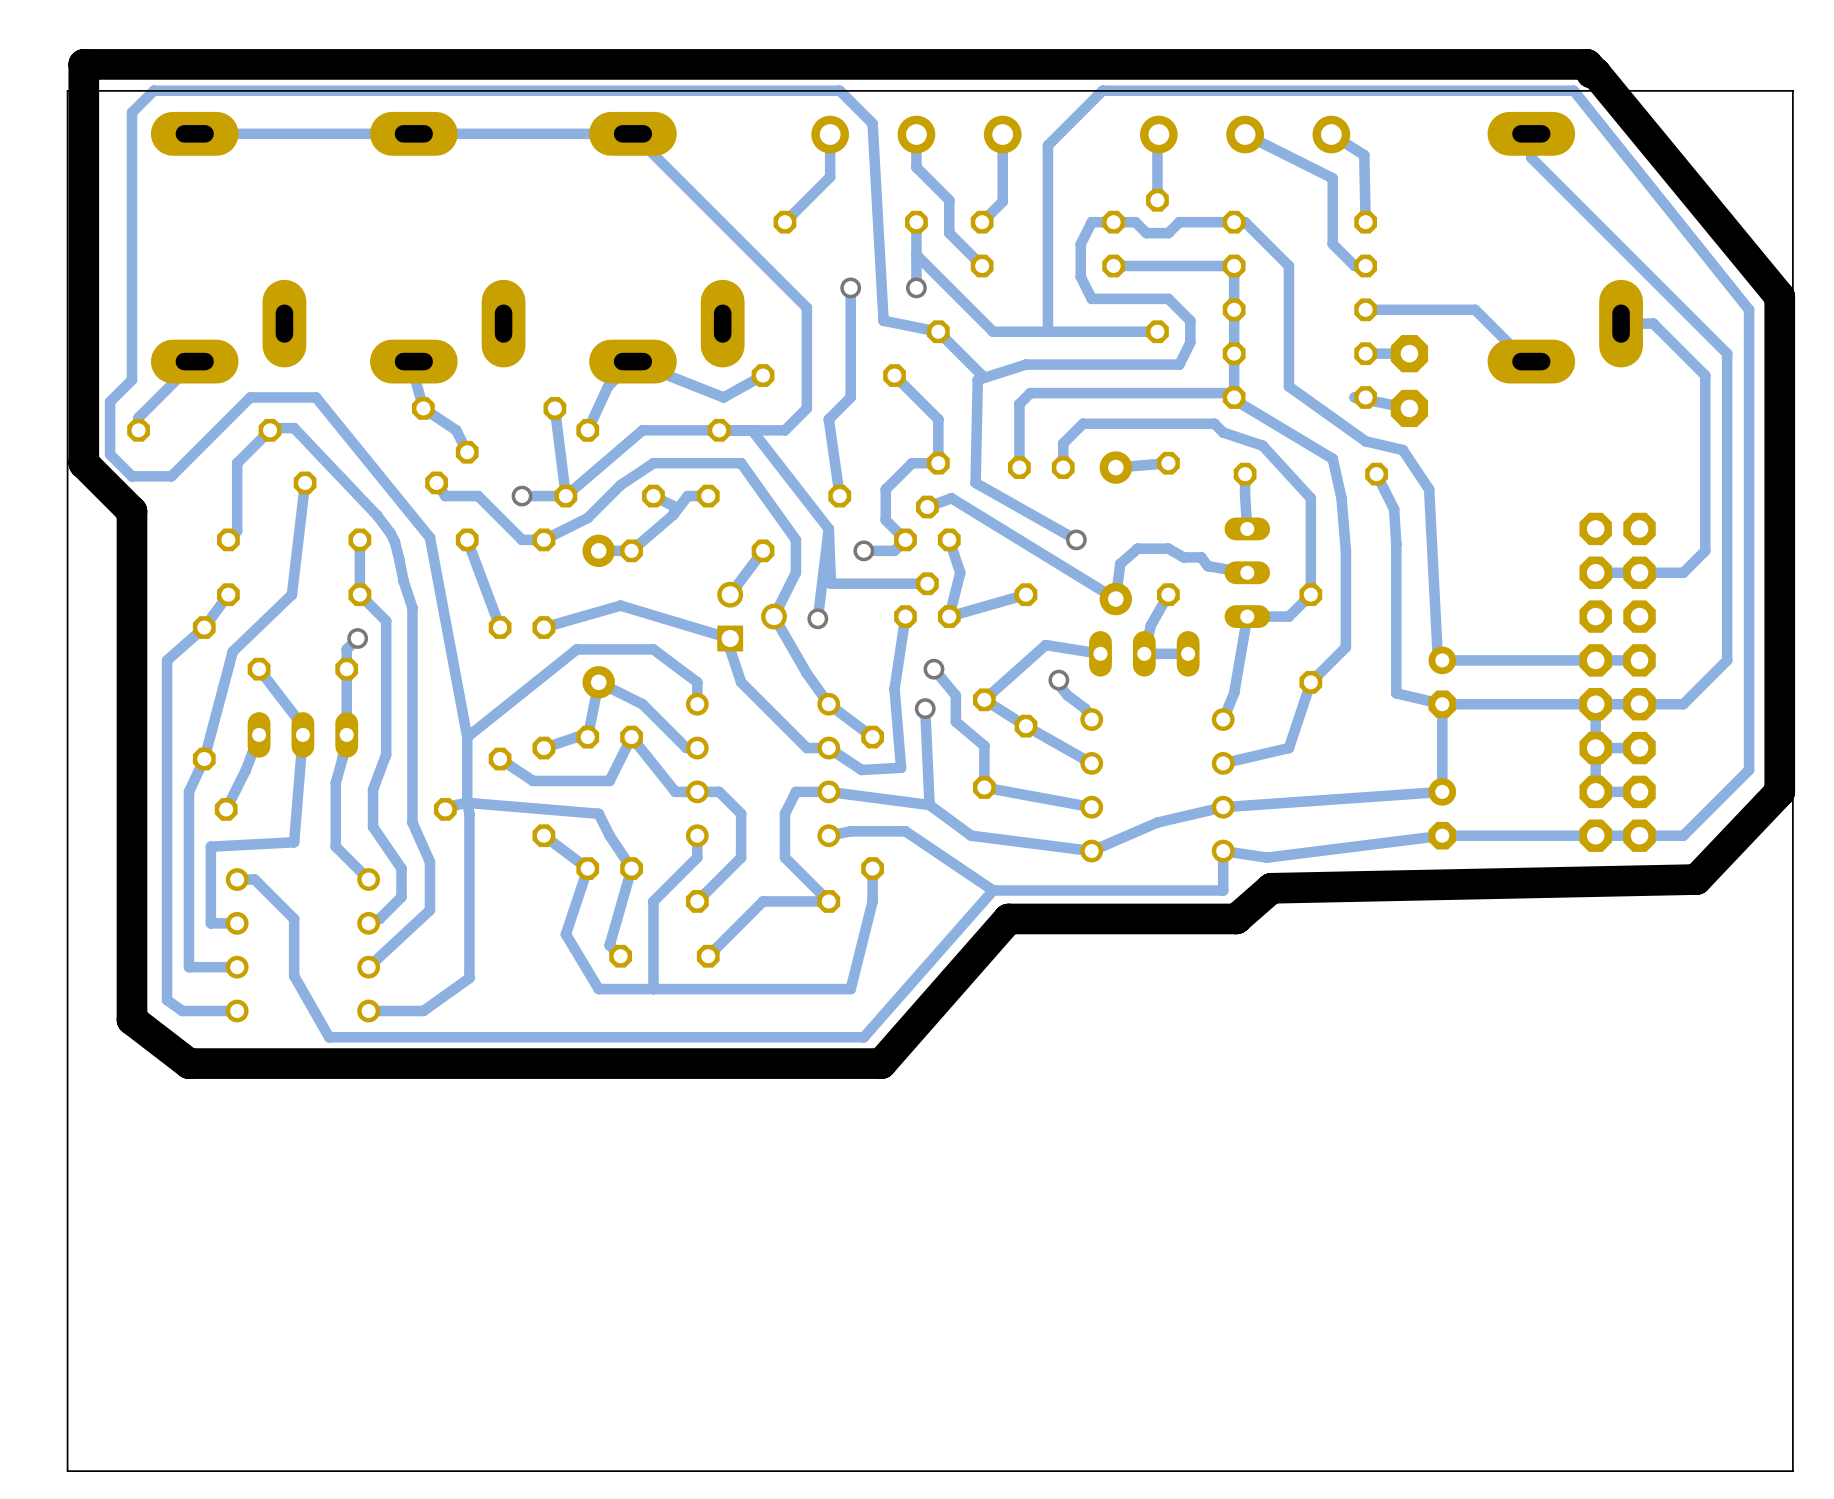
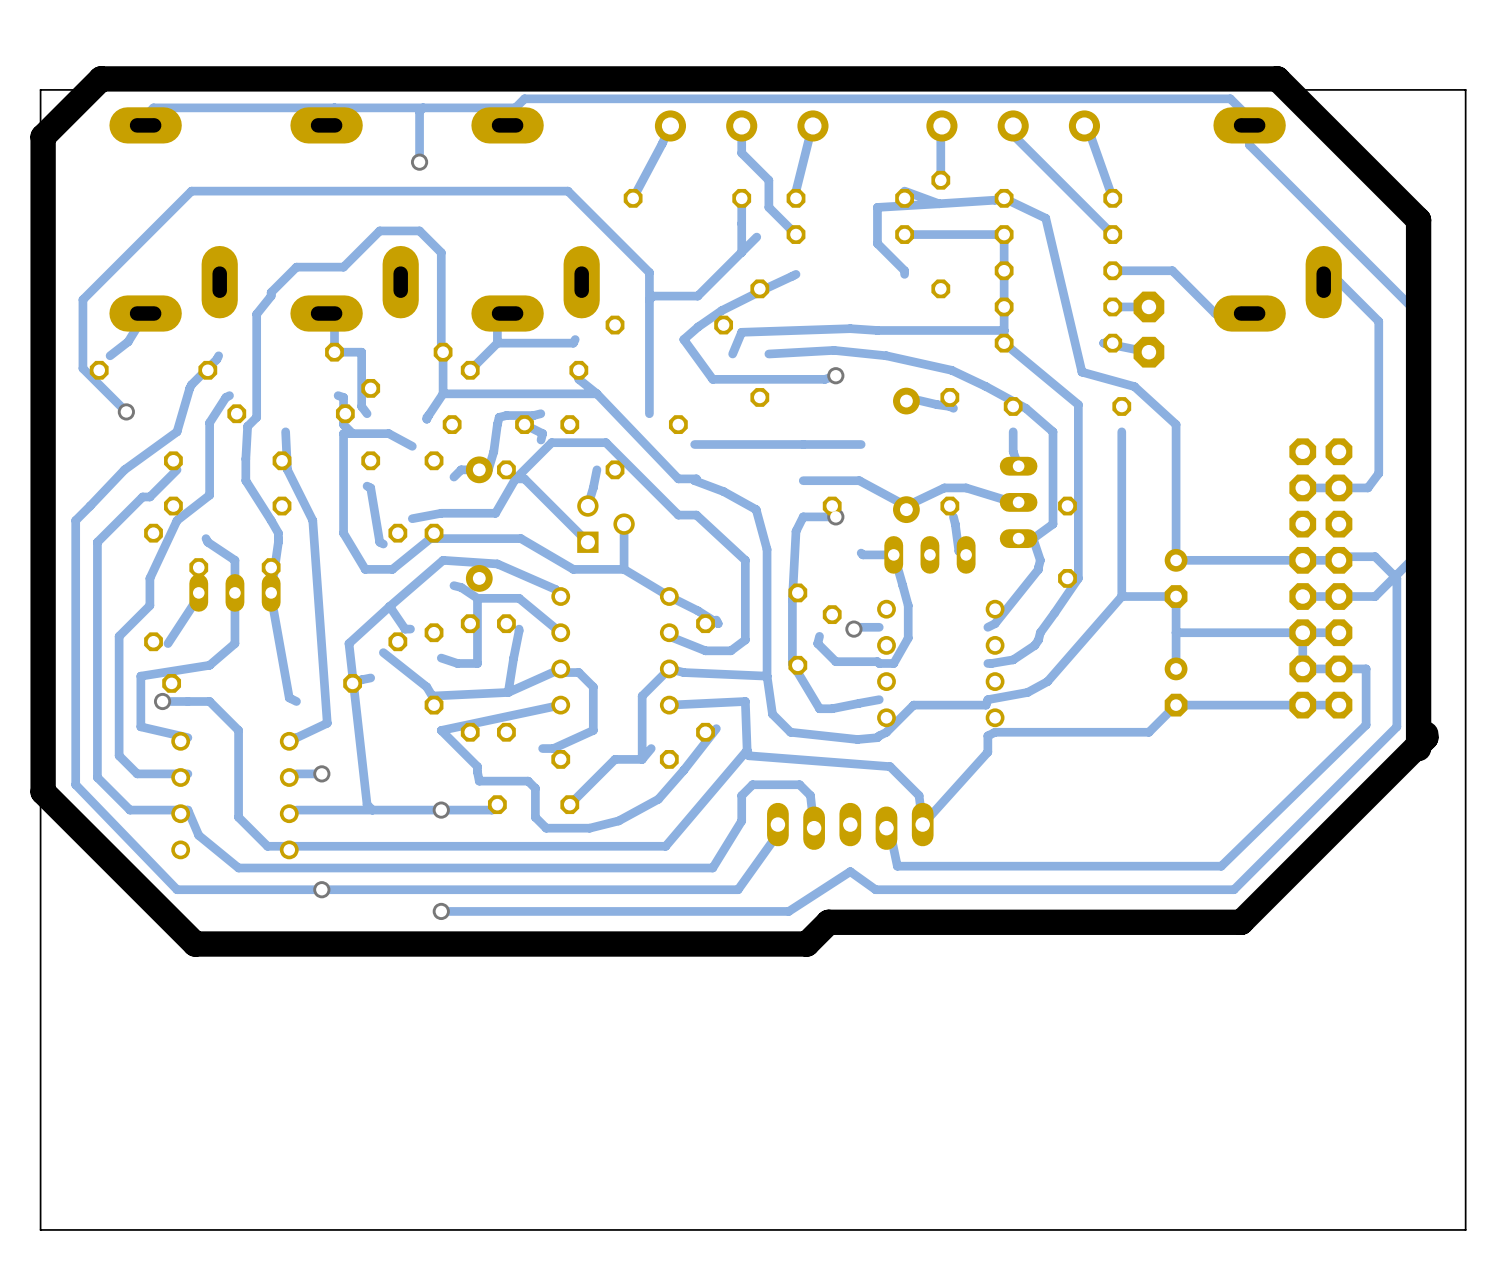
board edge: (1591, 68) (1586, 64) (83, 64) (83, 463) (131, 511) (131, 1019) (188, 1063) (881, 1063) (1008, 918) (1236, 918) (1271, 888) (1696, 879) (1779, 791) (1779, 296) (1595, 73) (1591, 73) -> none
track: none -> (423, 107) (419, 111) (419, 162)
track: (194, 133) (632, 133) (806, 307) (806, 408) (784, 430) (642, 430) (565, 496) -> (145, 125) (144, 116) (153, 107) (515, 107) (507, 125) (506, 116) (524, 98) (1230, 98) (1248, 116) (1249, 125)
track: (830, 134) (830, 176) (784, 222) -> (670, 125) (633, 198)
track: (1002, 134) (1002, 201) (982, 222) -> (812, 125) (796, 191)
track: (1245, 134) (1332, 178) (1332, 244) (1354, 266) (1365, 266) -> (1013, 125) (1013, 135) (1112, 234)
track: (1331, 134) (1364, 155) (1365, 222) -> (1084, 125) (1091, 136) (1112, 198)
via: none -> (419, 162)
track: none -> (904, 191) (938, 203)
track: none -> (938, 203) (877, 207) (877, 216)
track: (1080, 244) (1091, 222) (1135, 222) (1146, 233) (1168, 233) (1179, 222) (1245, 222) (1288, 266) (1288, 386) (1365, 441) (1402, 450) (1429, 489) (1437, 660) (1442, 660) -> (938, 203) (1004, 198) (1045, 218) (1081, 372) (1134, 386) (1176, 424) (1176, 560)
track: (916, 255) (993, 331) (1157, 331) -> none
track: none -> (756, 237) (697, 296) (653, 296) (649, 299)
track: (1080, 276) (1091, 298) (1168, 298) (1190, 320) (1190, 342) (1179, 364) (1025, 364) (977, 379) -> (877, 243) (904, 270) (904, 274)
track: (850, 287) (850, 397) (828, 419) (839, 496) -> none
via: (850, 287) -> none
via: (916, 287) -> none
track: (1437, 309) (1475, 309) (1526, 361) -> (1172, 270) (1215, 313) (1245, 313)
track: none -> (796, 274) (721, 310) (683, 339) (712, 379) (824, 379) (835, 375)
track: (1640, 323) (1653, 323) (1705, 375) (1705, 550) (1683, 572) (1674, 572) -> (1339, 282) (1378, 321) (1378, 473) (1367, 487)
track: (1047, 331) (1047, 145) (1102, 90) (1573, 90) (1749, 309) (1749, 769) (1683, 835) (1639, 835) -> none
track: (194, 361) (138, 417) (138, 430) -> (145, 313) (128, 341) (110, 355)
track: (413, 361) (413, 374) (423, 408) (456, 430) (467, 452) -> (326, 313) (334, 321) (334, 352) (361, 352) (361, 406) (367, 413)
track: (632, 361) (723, 397) (763, 375) -> none
track: (620, 373) (608, 386) (587, 430) -> (497, 343) (470, 370)
track: none -> (497, 323) (497, 343)
track: (894, 375) (938, 419) (938, 463) (912, 463) (885, 489) (885, 520) (905, 539) (894, 550) (863, 550) -> none
track: (977, 379) (982, 375) (938, 331) (883, 320) (872, 123) (839, 90) (153, 90) (131, 112) (131, 379) (110, 401) (110, 454) (131, 476) (171, 476) (250, 397) (316, 397) (429, 537) (467, 737) -> none
track: (977, 379) (975, 482) (1076, 539) -> none
track: none -> (1004, 330) (850, 328) (741, 332) (732, 354)
track: none -> (575, 339) (573, 343) (497, 343)
track: none -> (1004, 343) (1078, 404) (1078, 578) (1040, 632) (1034, 645) (1013, 659) (987, 663)
track: (554, 408) (565, 496) -> none
track: none -> (768, 354) (834, 350) (886, 355) (951, 370) (1025, 408) (1053, 431) (1053, 524) (1033, 538)
track: none -> (218, 355) (191, 384) (177, 431) (124, 469) (75, 520) (75, 784) (177, 889) (738, 889) (774, 839) (777, 824)
track: none -> (578, 370) (578, 379) (596, 393)
track: (752, 430) (828, 528) -> none
via: none -> (835, 375)
track: none -> (443, 393) (426, 419) (426, 417)
track: none -> (596, 393) (678, 478) (696, 478) (694, 480) (723, 491) (756, 509) (767, 549) (767, 676)
track: none -> (596, 393) (443, 393)
track: none -> (229, 395) (225, 397) (209, 422) (209, 495) (177, 520) (149, 578) (149, 605) (119, 636) (119, 755) (137, 773) (187, 773)
track: none -> (338, 395) (343, 397) (343, 424) (352, 433)
track: none -> (906, 397) (953, 408)
track: (1168, 463) (1115, 467) -> none
track: (1019, 467) (1019, 404) (1030, 393) (1229, 393) (1234, 399) (1332, 458) (1341, 498) (1345, 550) (1345, 647) (1310, 682) (1288, 748) (1223, 763) -> none
part: (1041, 467) -> none
track: (1063, 467) (1063, 443) (1082, 423) (1214, 423) (1223, 432) (1262, 445) (1310, 498) (1310, 594) (1288, 616) (1247, 616) (1234, 693) (1223, 719) -> none
track: (1245, 474) (1247, 528) -> none
track: (1376, 474) (1394, 509) (1396, 544) (1396, 693) (1442, 704) (1595, 704) (1595, 748) -> (1176, 632) (1302, 632)
track: none -> (126, 411) (82, 368) (82, 299) (191, 191) (567, 191) (649, 272) (649, 413)
via: none -> (126, 411)
track: (305, 482) (291, 594) (232, 651) (204, 759) (188, 791) (188, 800) -> none
track: (436, 482) (445, 496) (478, 496) (522, 539) (543, 539) (587, 517) (620, 485) (653, 463) (741, 463) (795, 539) (795, 572) (774, 616) (806, 673) (828, 704) (872, 737) -> none
via: (522, 496) -> none
track: (565, 496) (522, 496) -> none
track: (708, 496) (687, 496) (673, 514) (631, 550) (609, 550) -> (540, 413) (499, 417) (493, 451) (488, 469)
track: none -> (285, 431) (287, 469) (312, 520) (327, 723) (292, 739) (296, 737)
track: none -> (1013, 431) (1013, 451) (1018, 466)
track: none -> (1121, 431) (1121, 596)
track: (927, 507) (951, 498) (1115, 599) (1120, 564) (1137, 548) (1168, 548) (1183, 557) (1201, 557) (1207, 566) (1247, 572) -> none
track: none -> (861, 444) (694, 444)
track: none -> (412, 446) (388, 433) (343, 433) (343, 533) (365, 569) (392, 569) (430, 538) (520, 538) (573, 569) (624, 569)
part: (927, 523) -> none
track: (828, 528) (830, 583) (927, 583) -> none
track: (828, 528) (817, 618) -> none
track: (228, 539) (237, 531) (237, 463) (272, 428) (294, 428) (377, 515) (394, 542) (403, 581) (412, 607) (412, 822) (429, 862) (429, 910) (368, 967) -> none
track: (359, 539) (359, 594) (386, 620) (386, 754) (373, 789) (373, 826) (401, 868) (401, 897) (379, 918) (368, 923) -> none
track: (467, 539) (500, 627) -> none
track: (949, 539) (960, 572) (949, 616) (1025, 594) -> none
via: (1076, 539) -> none
track: none -> (177, 469) (149, 496) (142, 496) (97, 542) (97, 777) (129, 810) (187, 810) (198, 835) (238, 868) (712, 868) (741, 820) (741, 795) (752, 784) (799, 784) (810, 795) (814, 828)
track: none -> (479, 469) (461, 469) (453, 477)
track: (763, 550) (730, 594) -> (596, 469) (587, 506)
via: (863, 550) -> none
track: none -> (515, 478) (524, 478) (587, 542)
track: none -> (515, 478) (495, 513) (441, 513) (412, 518)
track: none -> (515, 478) (551, 442) (605, 442) (678, 515) (696, 515) (745, 560) (745, 639) (730, 650) (705, 650) (669, 636) (672, 636) (669, 632)
track: none -> (803, 480) (859, 480) (906, 506) (944, 487) (966, 487) (1018, 502)
track: none -> (367, 486) (370, 487) (379, 542) (383, 544)
part position: (1247, 572) -> (1018, 502)
track: (228, 594) (204, 627) (167, 660) (167, 1000) (182, 1011) (237, 1011) -> none
track: (1168, 594) (1150, 625) (1144, 653) (1188, 653) -> (953, 516) (958, 551) (966, 554)
part: (927, 600) -> none
track: none -> (835, 516) (803, 516) (796, 531) (792, 600) (792, 663) (819, 708) (832, 708) (879, 699)
via: none -> (835, 516)
track: none -> (624, 524) (624, 569)
track: (905, 616) (894, 688) (901, 767) (861, 769) (828, 748) (806, 748) (741, 682) (730, 649) (730, 638) (620, 605) (543, 627) -> none
via: (817, 618) -> none
track: none -> (1033, 538) (1040, 560) (1038, 569) (995, 623) (987, 627)
track: (357, 638) (346, 649) (346, 699) -> (443, 393) (441, 252) (419, 230) (379, 230) (343, 267) (296, 267) (271, 292) (271, 296) (256, 314) (256, 417) (247, 426) (245, 458) (245, 480) (278, 533) (271, 592)
via: (357, 638) -> none
track: none -> (861, 553) (862, 554) (893, 554) (908, 605) (908, 638) (893, 663) (879, 663) (877, 661) (835, 661) (817, 643) (819, 636)
track: (1100, 653) (1045, 645) (984, 699) (1091, 763) -> none
track: none -> (1338, 560) (1342, 556) (1375, 556) (1396, 578) (1396, 726) (1233, 889) (875, 889) (850, 871) (788, 911) (441, 911)
track: (259, 669) (302, 726) -> (206, 538) (207, 542) (234, 560) (234, 614)
track: (933, 669) (955, 695) (955, 721) (984, 745) (984, 787) (1091, 807) -> none
via: (933, 669) -> none
track: none -> (624, 569) (718, 623) (716, 620)
track: (1058, 680) (1056, 682) (1067, 695) (1085, 708) (1091, 719) -> none
via: (1058, 680) -> none
track: none -> (453, 585) (461, 587) (477, 598)
track: none -> (198, 592) (198, 596) (167, 643)
track: (346, 704) (346, 734) (335, 783) (335, 846) (368, 879) -> (271, 596) (289, 697) (296, 701)
track: (697, 704) (697, 682) (653, 649) (576, 649) (467, 737) -> (560, 596) (555, 589) (497, 563) (443, 560) (389, 606)
track: none -> (1121, 596) (1047, 681) (1027, 692) (987, 699) (986, 705) (913, 705) (886, 732) (877, 737) (857, 739) (790, 732) (772, 714) (767, 676)
track: none -> (1176, 596) (1121, 596)
track: none -> (477, 598) (477, 663) (457, 663) (441, 658)
track: (925, 708) (929, 805) -> none
via: (925, 708) -> none
track: none -> (389, 606) (348, 643) (367, 804) (372, 810)
track: none -> (389, 606) (405, 629) (410, 629)
track: (259, 734) (245, 769) (226, 809) -> none
track: (302, 734) (294, 842) (210, 846) (210, 923) (237, 923) -> (234, 621) (234, 643) (209, 665) (140, 676)
part position: (302, 734) -> (234, 592)
track: (467, 737) (467, 802) -> none
track: none -> (879, 627) (855, 627) (853, 629)
track: none -> (519, 629) (508, 692)
via: none -> (853, 629)
track: (697, 748) (686, 748) (642, 704) (598, 682) (587, 737) (576, 737) (543, 748) -> (560, 632) (519, 598) (477, 598)
track: (500, 759) (532, 780) (609, 780) (631, 737) (675, 791) (719, 791) (741, 813) (741, 857) (697, 901) -> none
track: none -> (383, 652) (426, 687) (432, 696) (508, 692)
track: (1442, 791) (1223, 807) (1157, 822) (1091, 851) (971, 835) (929, 805) -> none
track: none -> (1338, 668) (1366, 668) (1366, 725) (1221, 866) (897, 866) (890, 831) (886, 828)
track: none -> (767, 676) (683, 672) (669, 668) (642, 696) (642, 759) (651, 748)
track: (467, 802) (598, 813) (609, 835) (631, 868) (609, 945) (620, 956) -> (296, 810) (491, 810) (497, 804)
track: (467, 802) (469, 813) (469, 978) (423, 1011) (368, 1011) -> none
track: (929, 805) (828, 791) (795, 791) (784, 813) (784, 857) (828, 901) (795, 901) -> none
track: none -> (508, 692) (560, 668) (564, 672) (578, 672) (593, 687) (593, 730) (553, 748) (542, 748)
track: none -> (162, 701) (209, 701) (238, 730) (238, 817) (267, 846) (665, 846) (747, 750)
via: none -> (162, 701)
track: (543, 835) (587, 868) (565, 934) (598, 989) (850, 989) (872, 901) (872, 868) -> none
track: (697, 835) (697, 857) (653, 901) (653, 989) -> (560, 705) (441, 730) (477, 766) (479, 781) (528, 781) (535, 788) (535, 817) (546, 828) (589, 828) (618, 820) (658, 799) (716, 728)
track: (828, 835) (850, 831) (905, 831) (993, 890) -> (669, 705) (745, 701) (747, 750)
track: (1442, 835) (1267, 857) (1223, 851) (1223, 890) (993, 890) -> (1176, 705) (1148, 732) (995, 732) (987, 735) (987, 752) (922, 824) (919, 795) (890, 766) (748, 755) (747, 750)
track: (188, 862) (188, 967) (237, 967) -> (140, 726) (187, 737)
board edge: none -> (1425, 734) (1425, 737) (1241, 922) (828, 922) (806, 944) (195, 944) (43, 791) (43, 136) (101, 78) (1277, 78) (1418, 220) (1418, 748)
track: (237, 879) (254, 879) (294, 918) (294, 975) (329, 1037) (863, 1037) (993, 890) -> none
track: none -> (321, 773) (296, 773)
via: none -> (321, 773)
via: none -> (441, 810)
part: none -> (850, 826)
via: none -> (321, 889)
via: none -> (441, 911)

